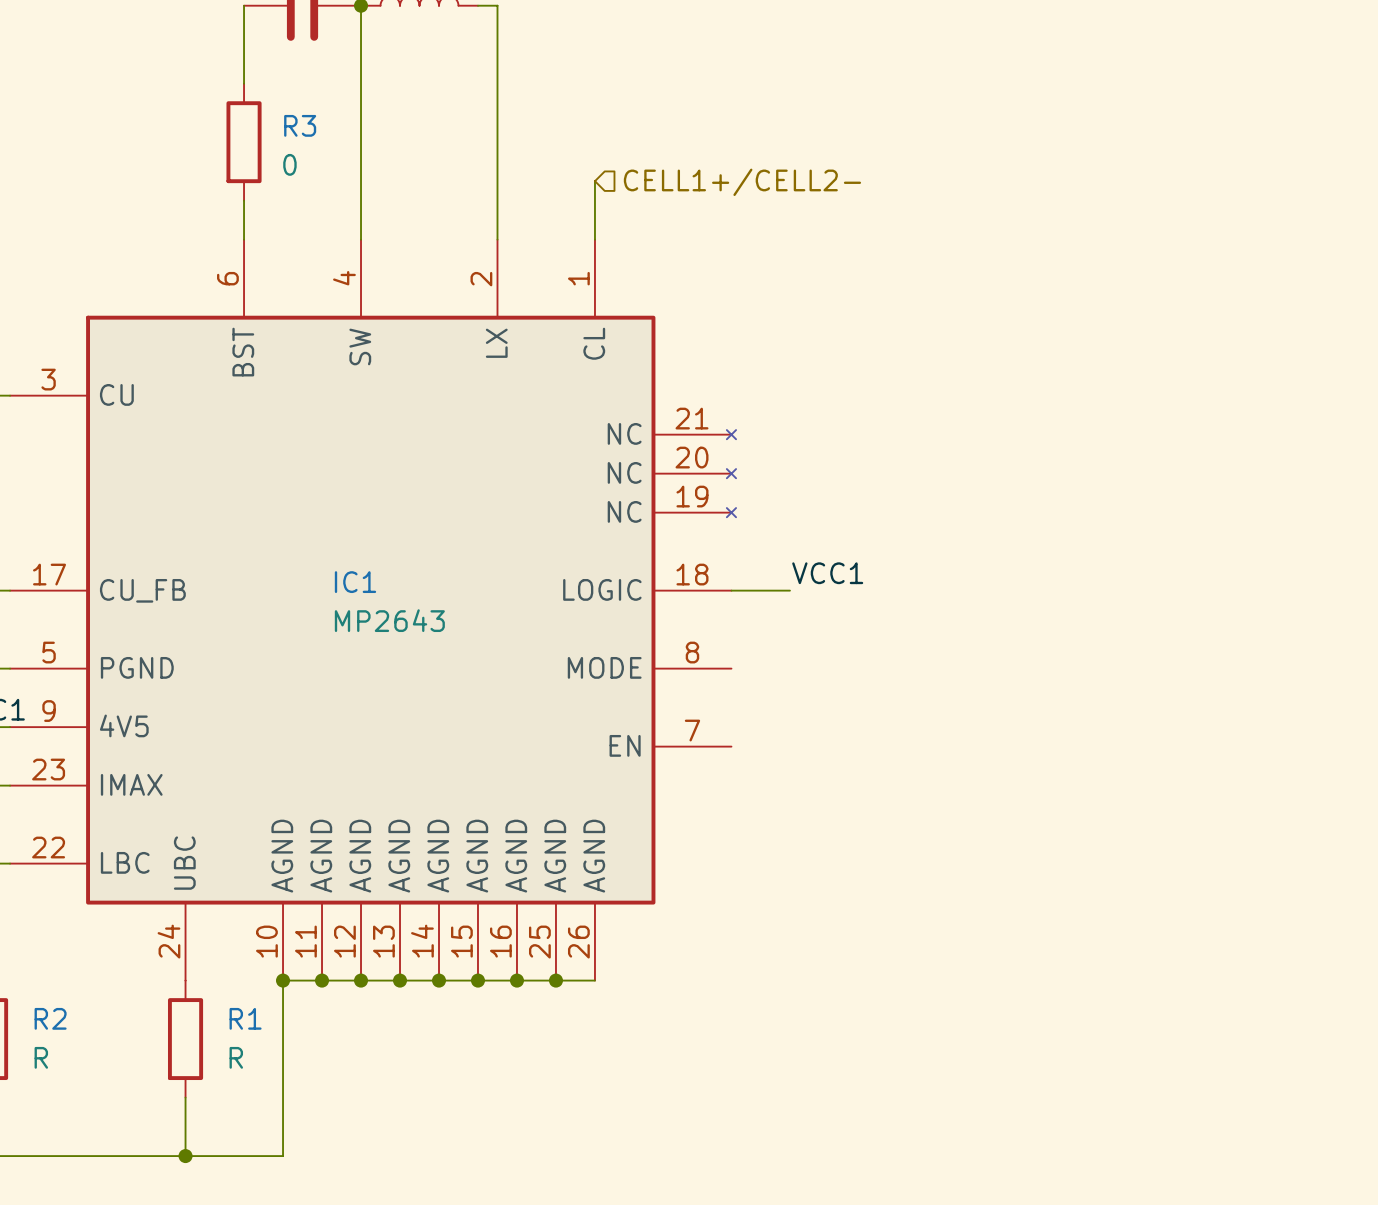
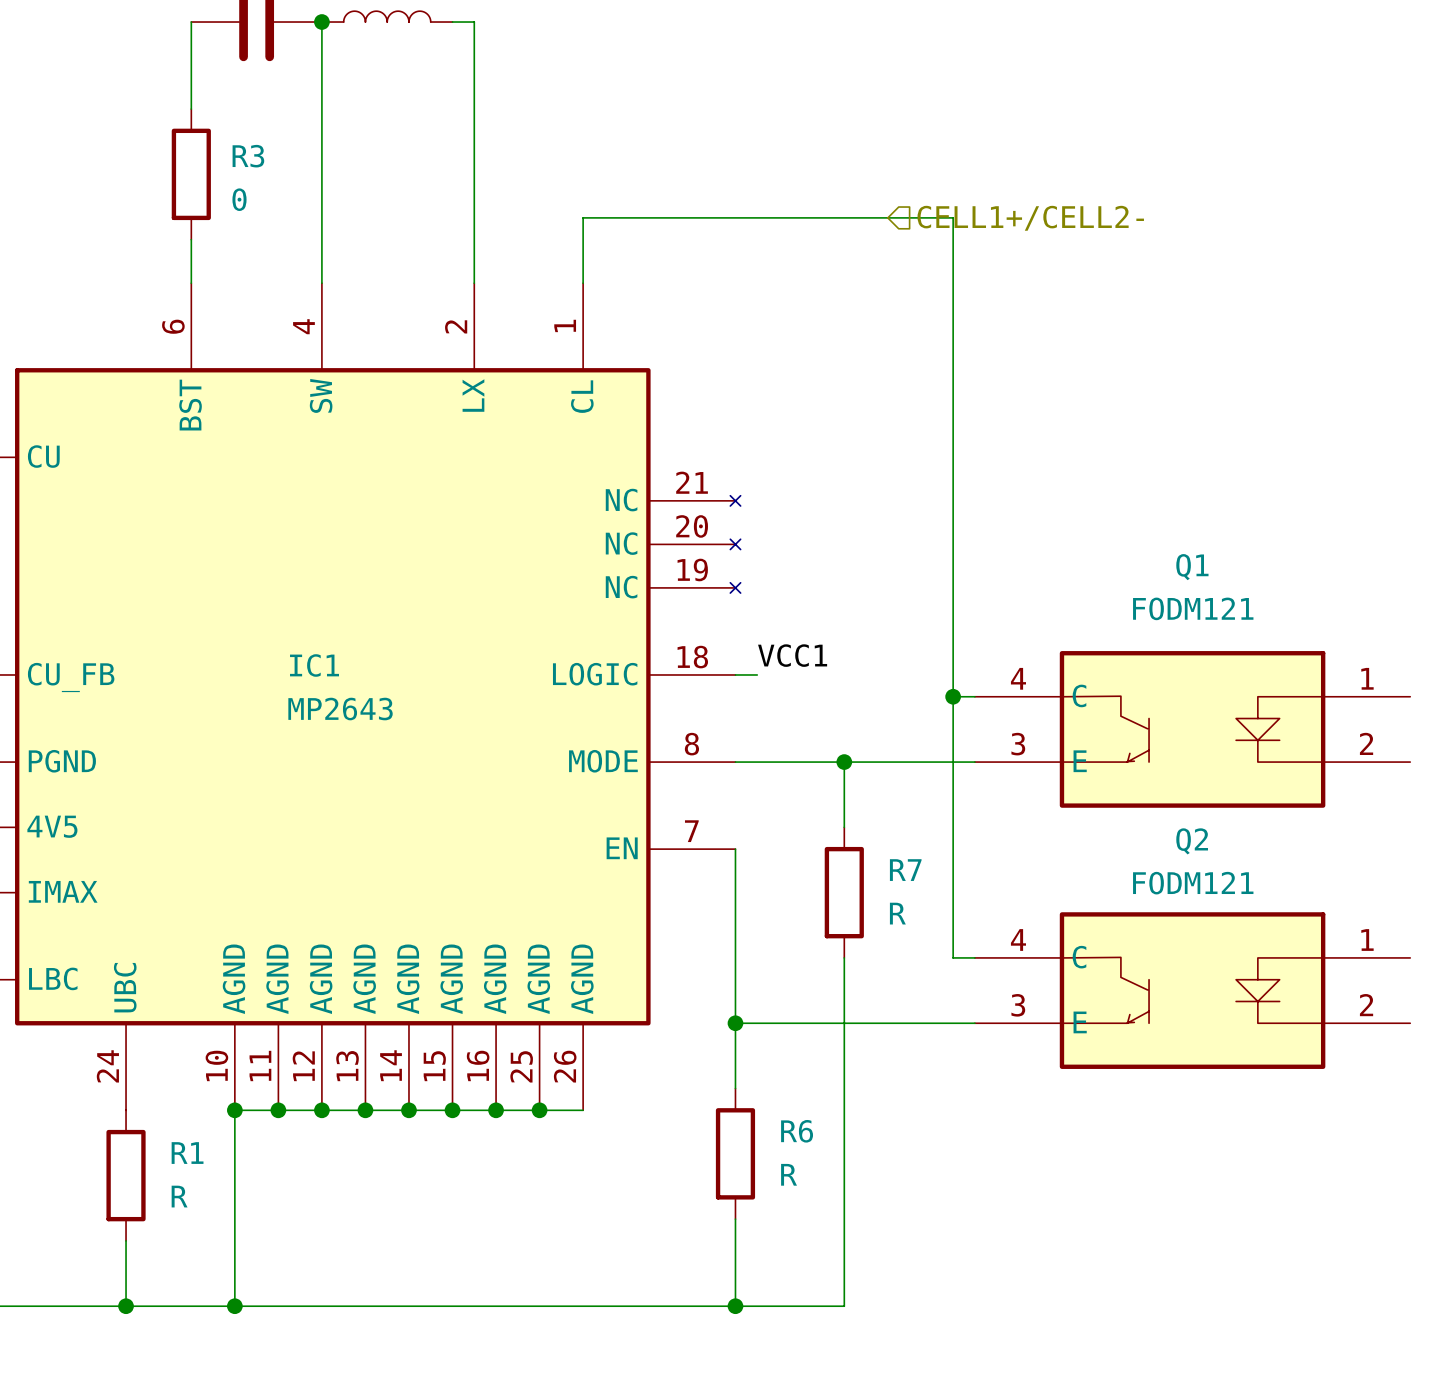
wire: none -> (583, 217) (953, 217) (953, 957) (974, 957)
hierarchical label position: CELL1+/CELL2- (742, 182) -> CELL1+/CELL2- (1030, 218)
label position: VCC1 (827, 573) -> VCC1 (792, 655)
wire: (750, 590) (789, 590) -> none
wire: none -> (953, 696) (974, 696)
junction: none -> (953, 696)
Q1: none -> FODM121 (1192, 729)
wire: none -> (735, 762) (974, 762)
wire: none -> (844, 762) (844, 827)
junction: none -> (844, 762)
wire: none -> (735, 849) (735, 1088)
R7: none -> R (844, 892)
wire: none -> (844, 957) (844, 1306) (234, 1306)
Q2: none -> FODM121 (1192, 990)
wire: none -> (735, 1023) (974, 1023)
junction: none -> (735, 1023)
R6: none -> R (735, 1153)
wire: none -> (735, 1219) (735, 1306)
junction: none -> (234, 1306)
junction: none -> (735, 1306)

